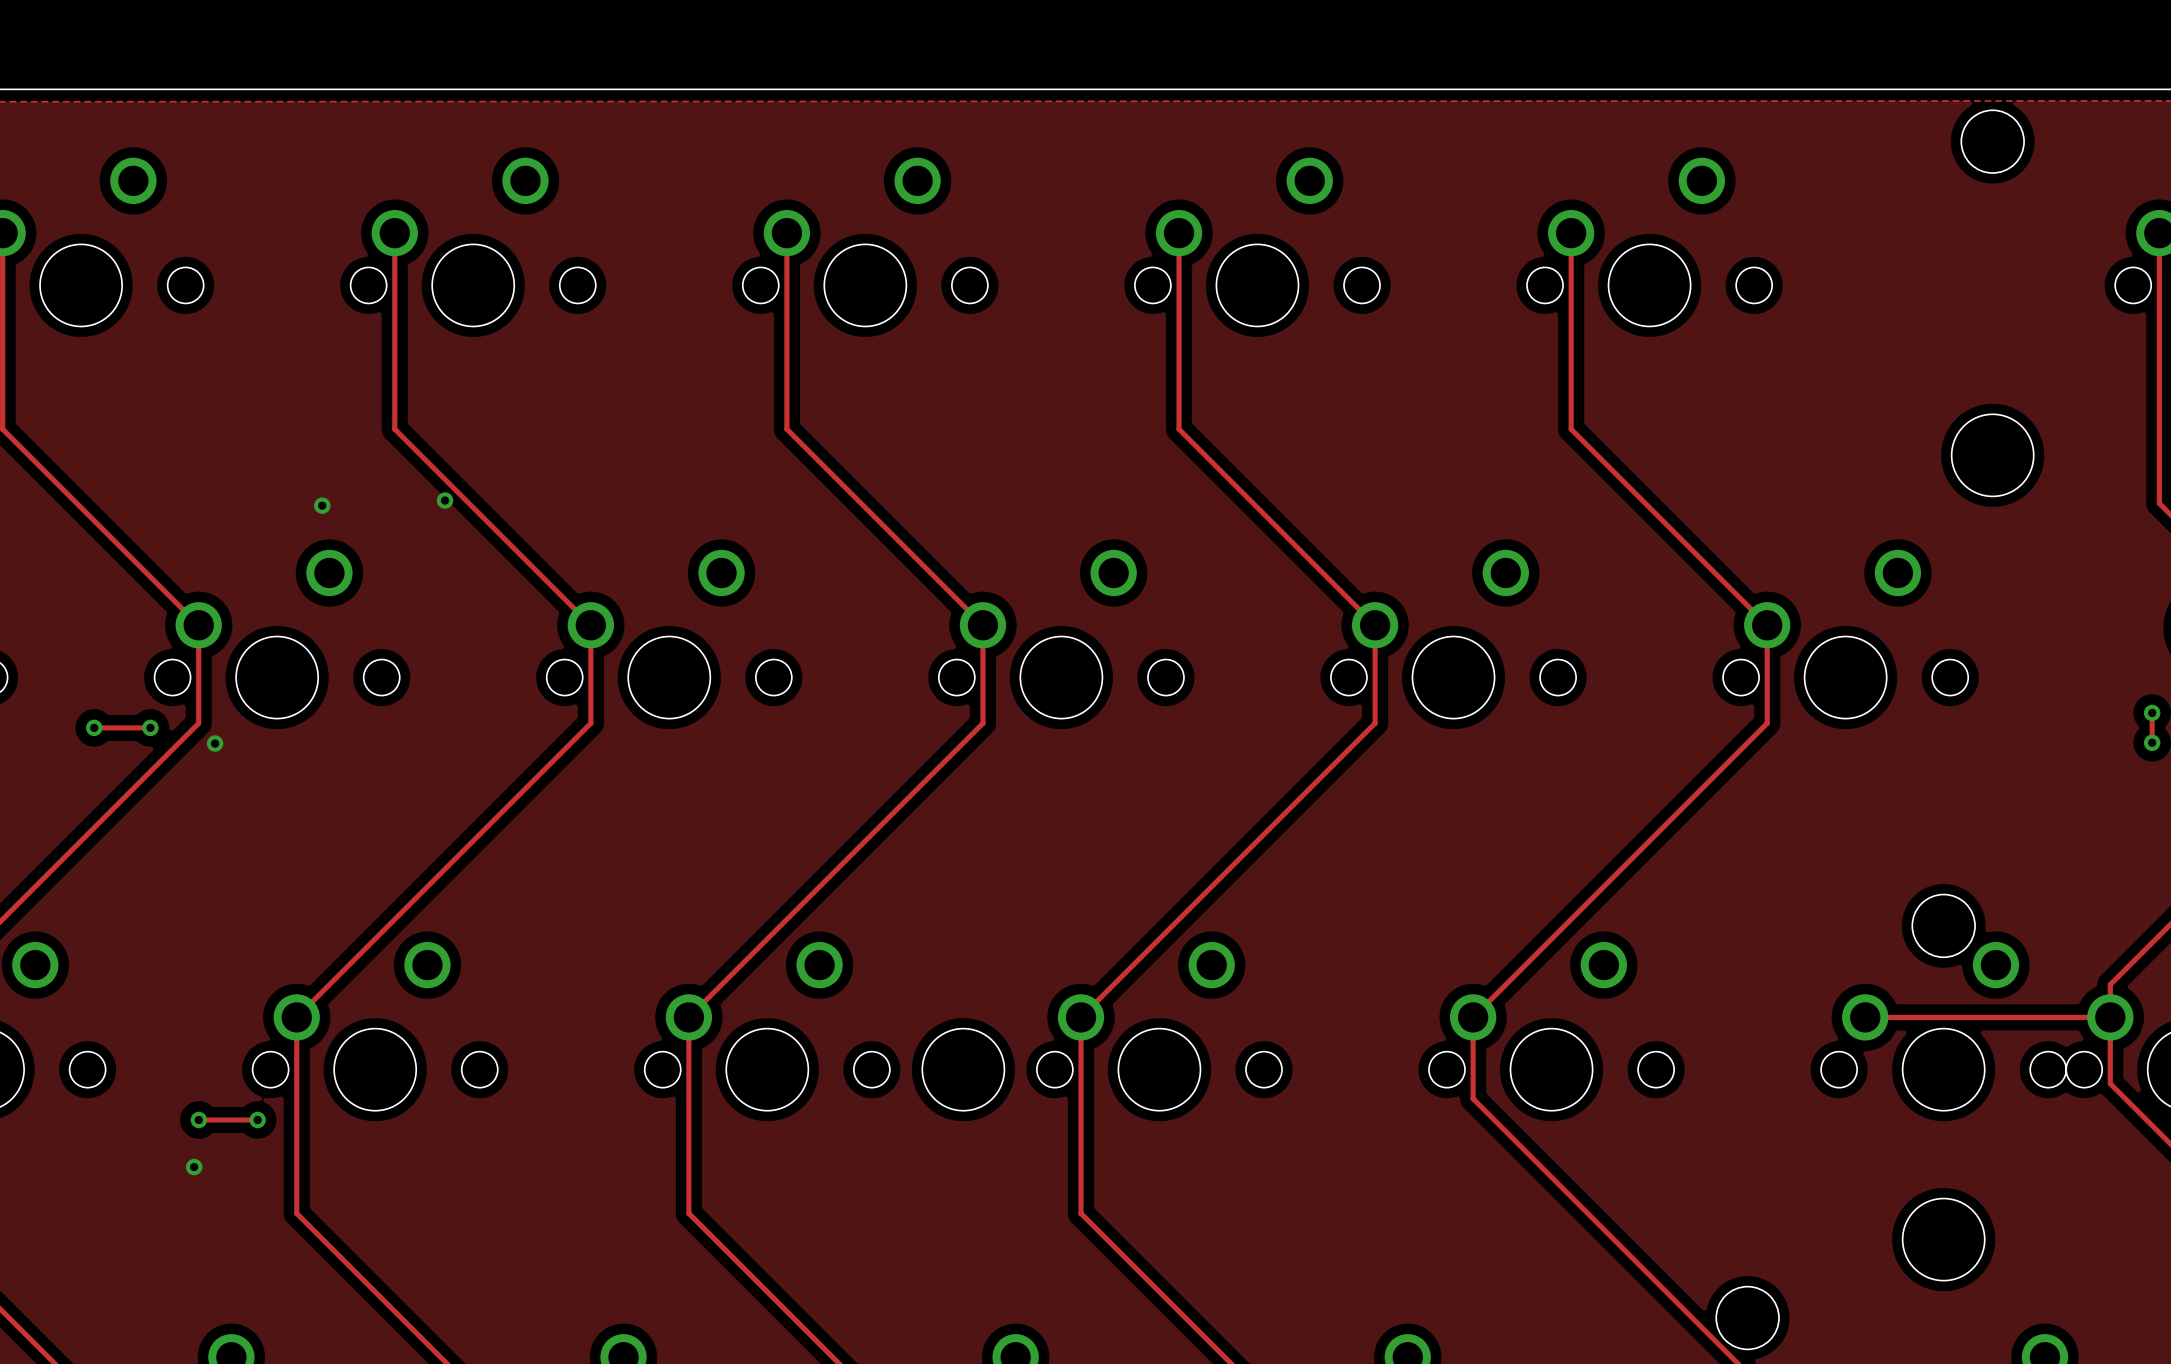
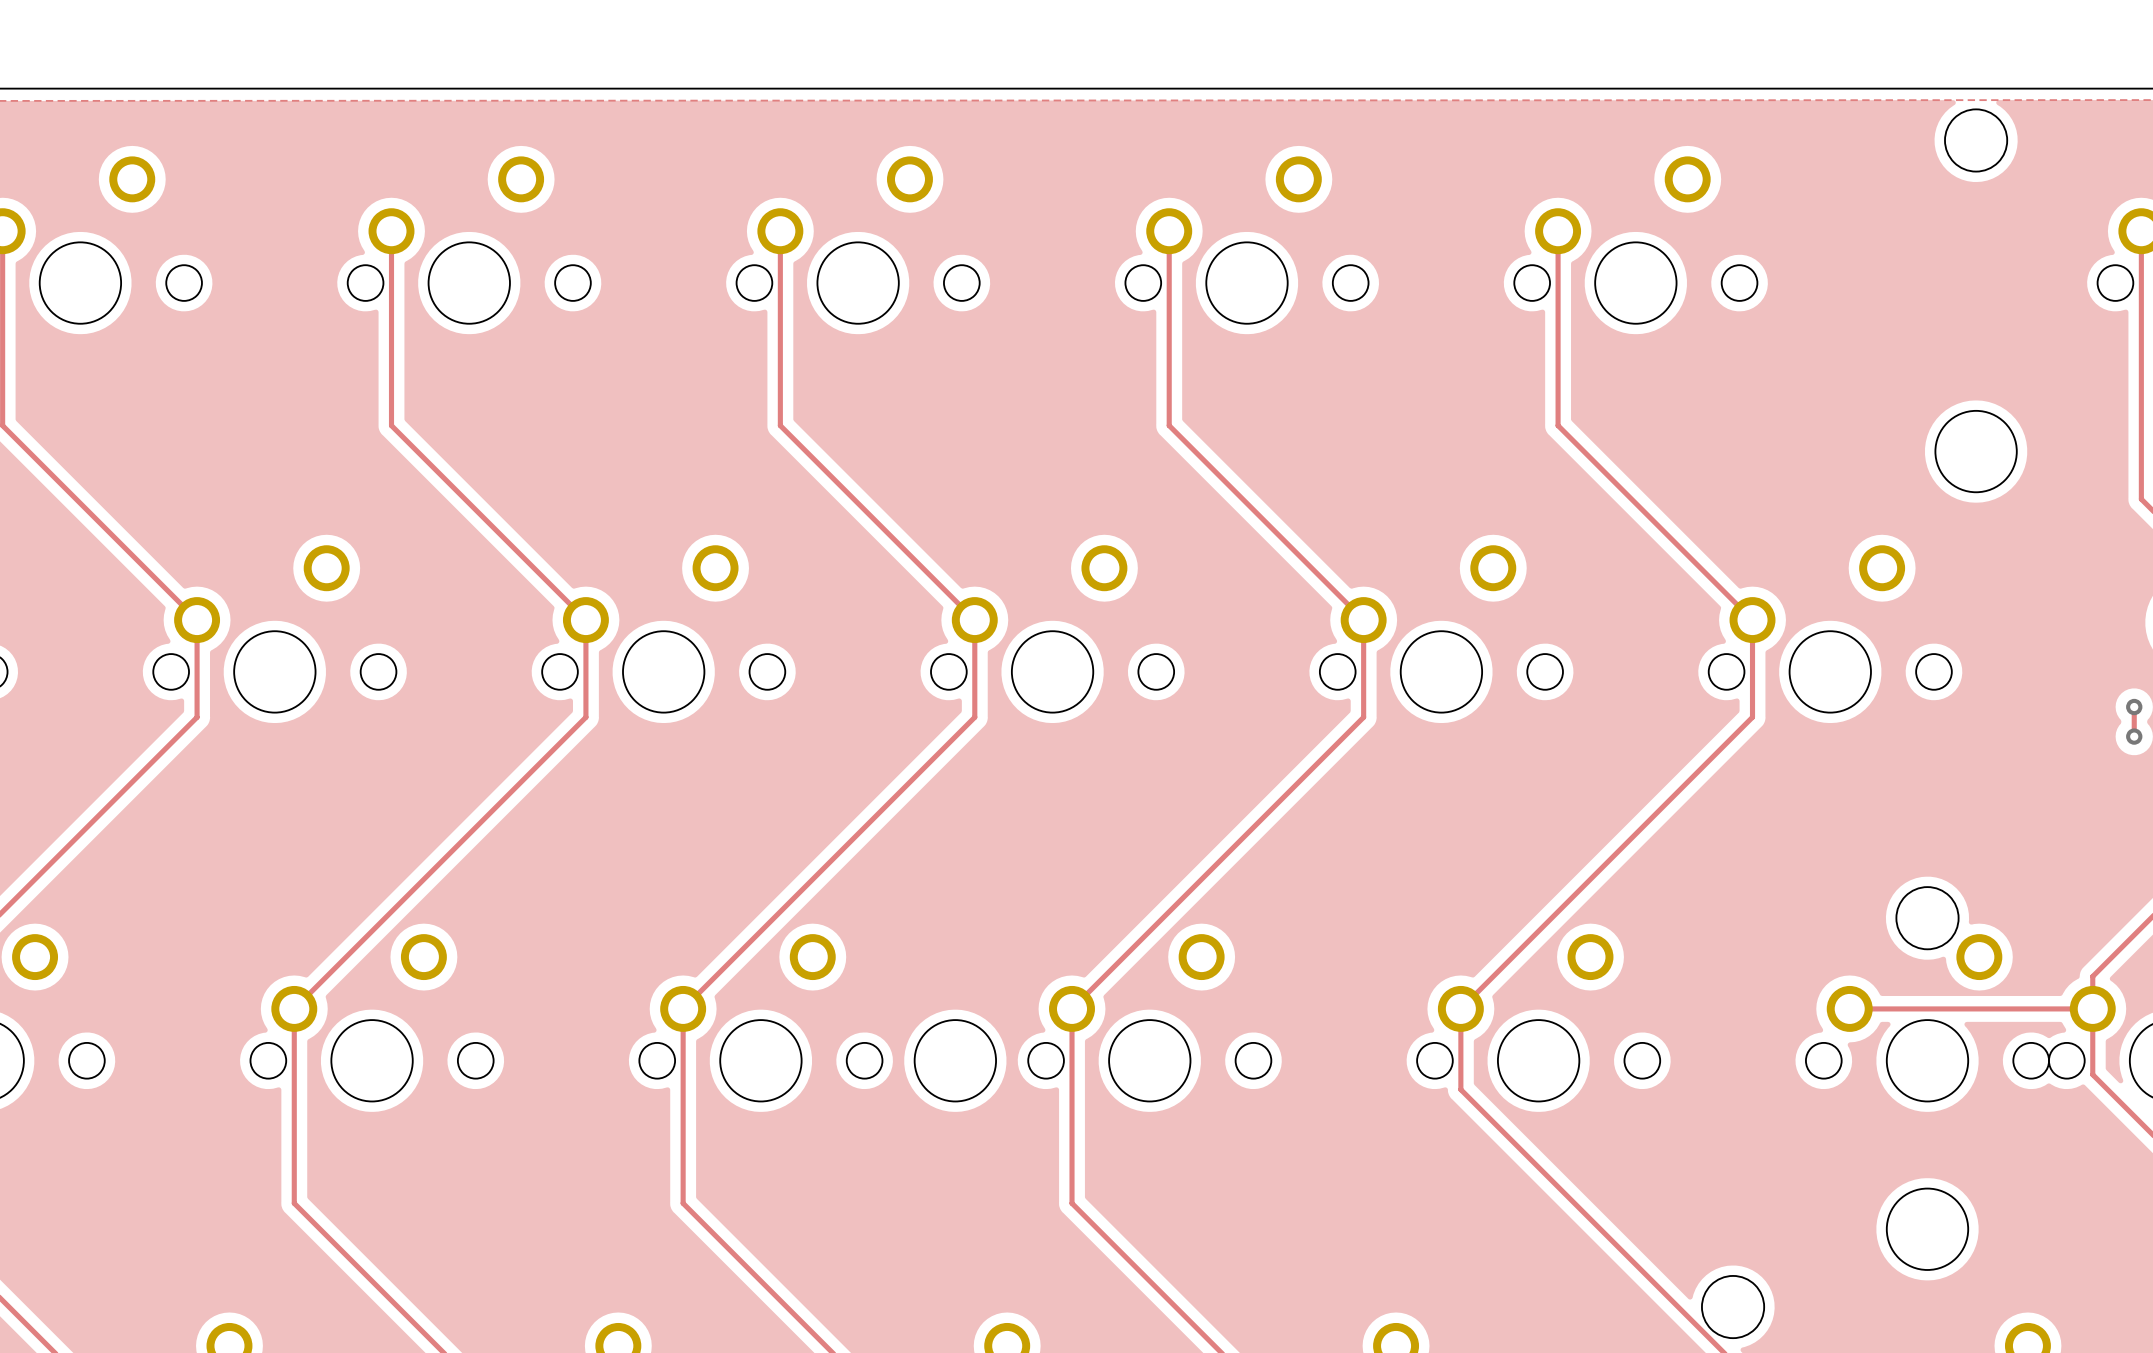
via: (445, 500) -> none
via: (322, 505) -> none
track: (94, 727) (150, 727) -> none
via: (94, 727) -> none
via: (150, 727) -> none
via: (215, 743) -> none
track: (198, 1120) (257, 1120) -> none
via: (198, 1120) -> none
via: (257, 1120) -> none
via: (194, 1167) -> none

